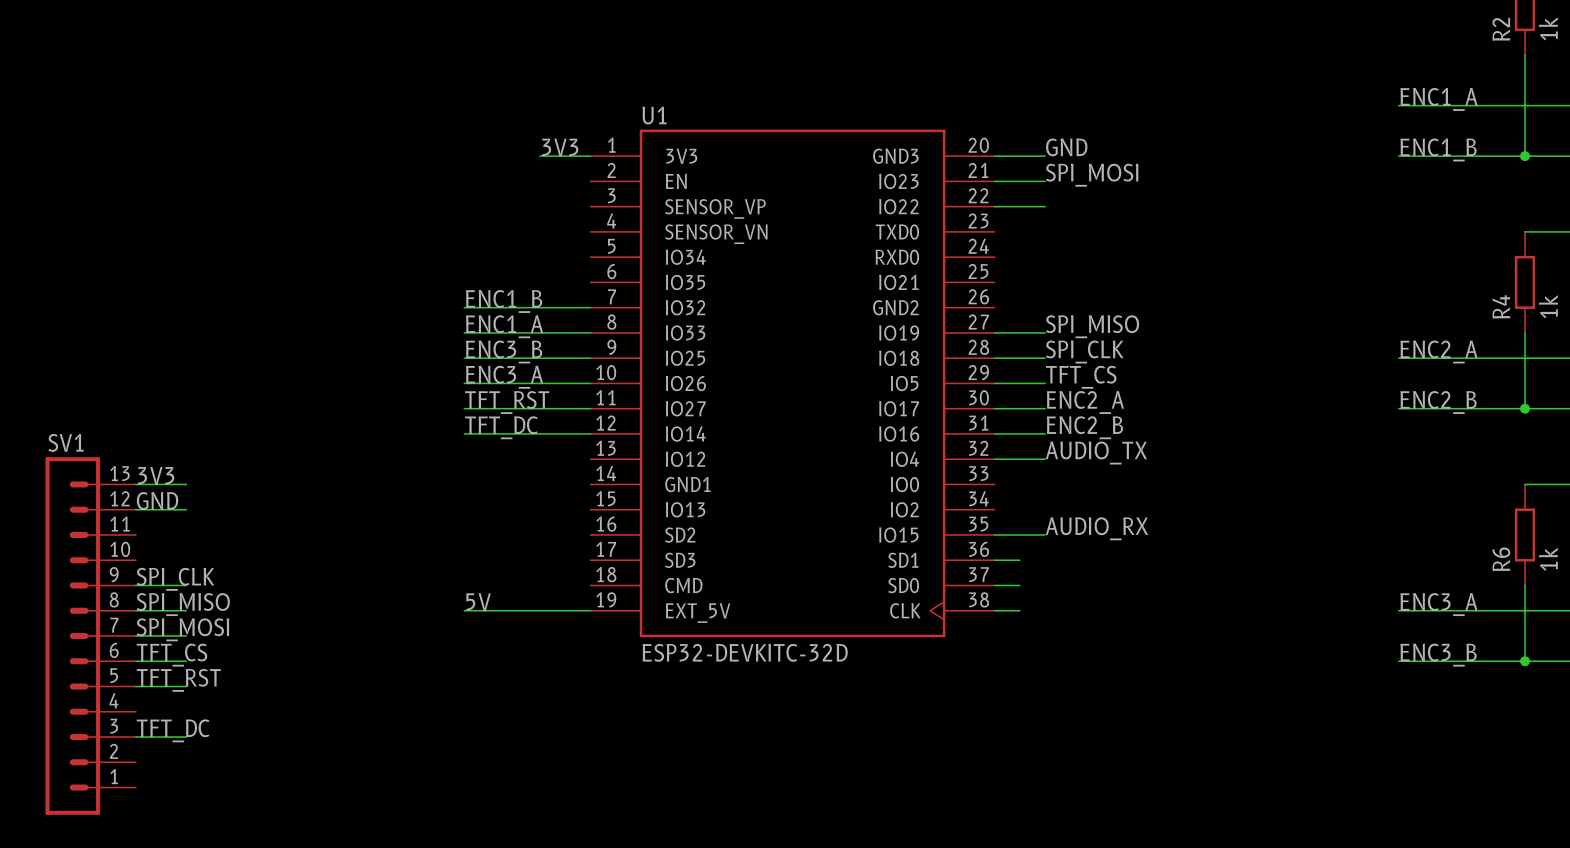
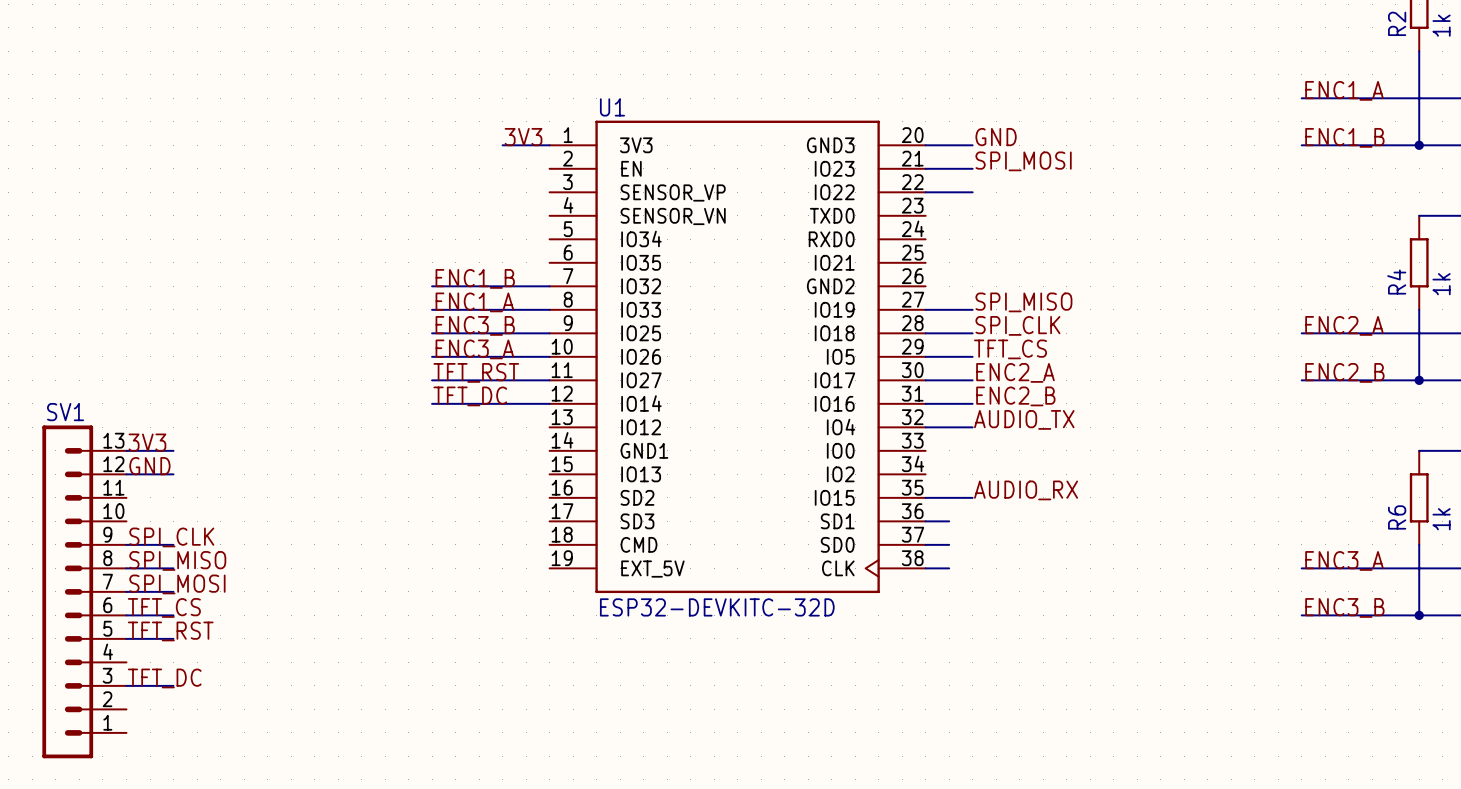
label: 5V (478, 602) -> none
wire: (464, 610) (590, 610) -> none

